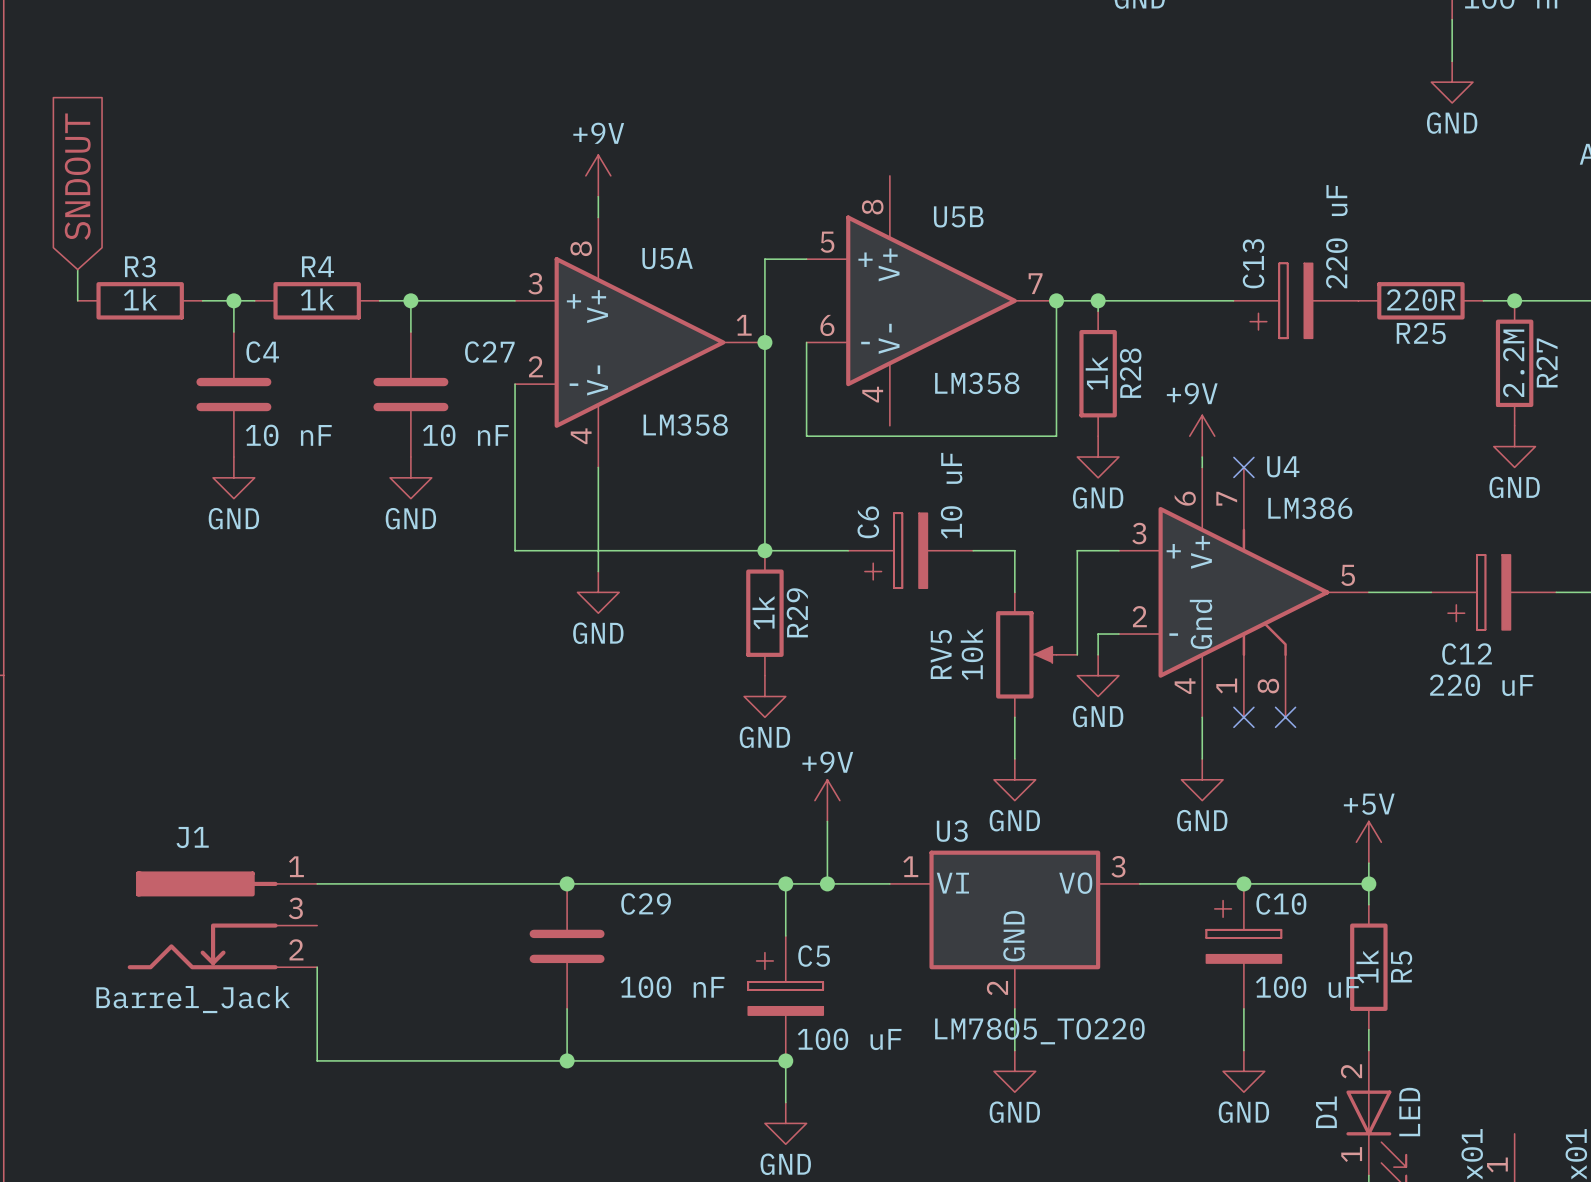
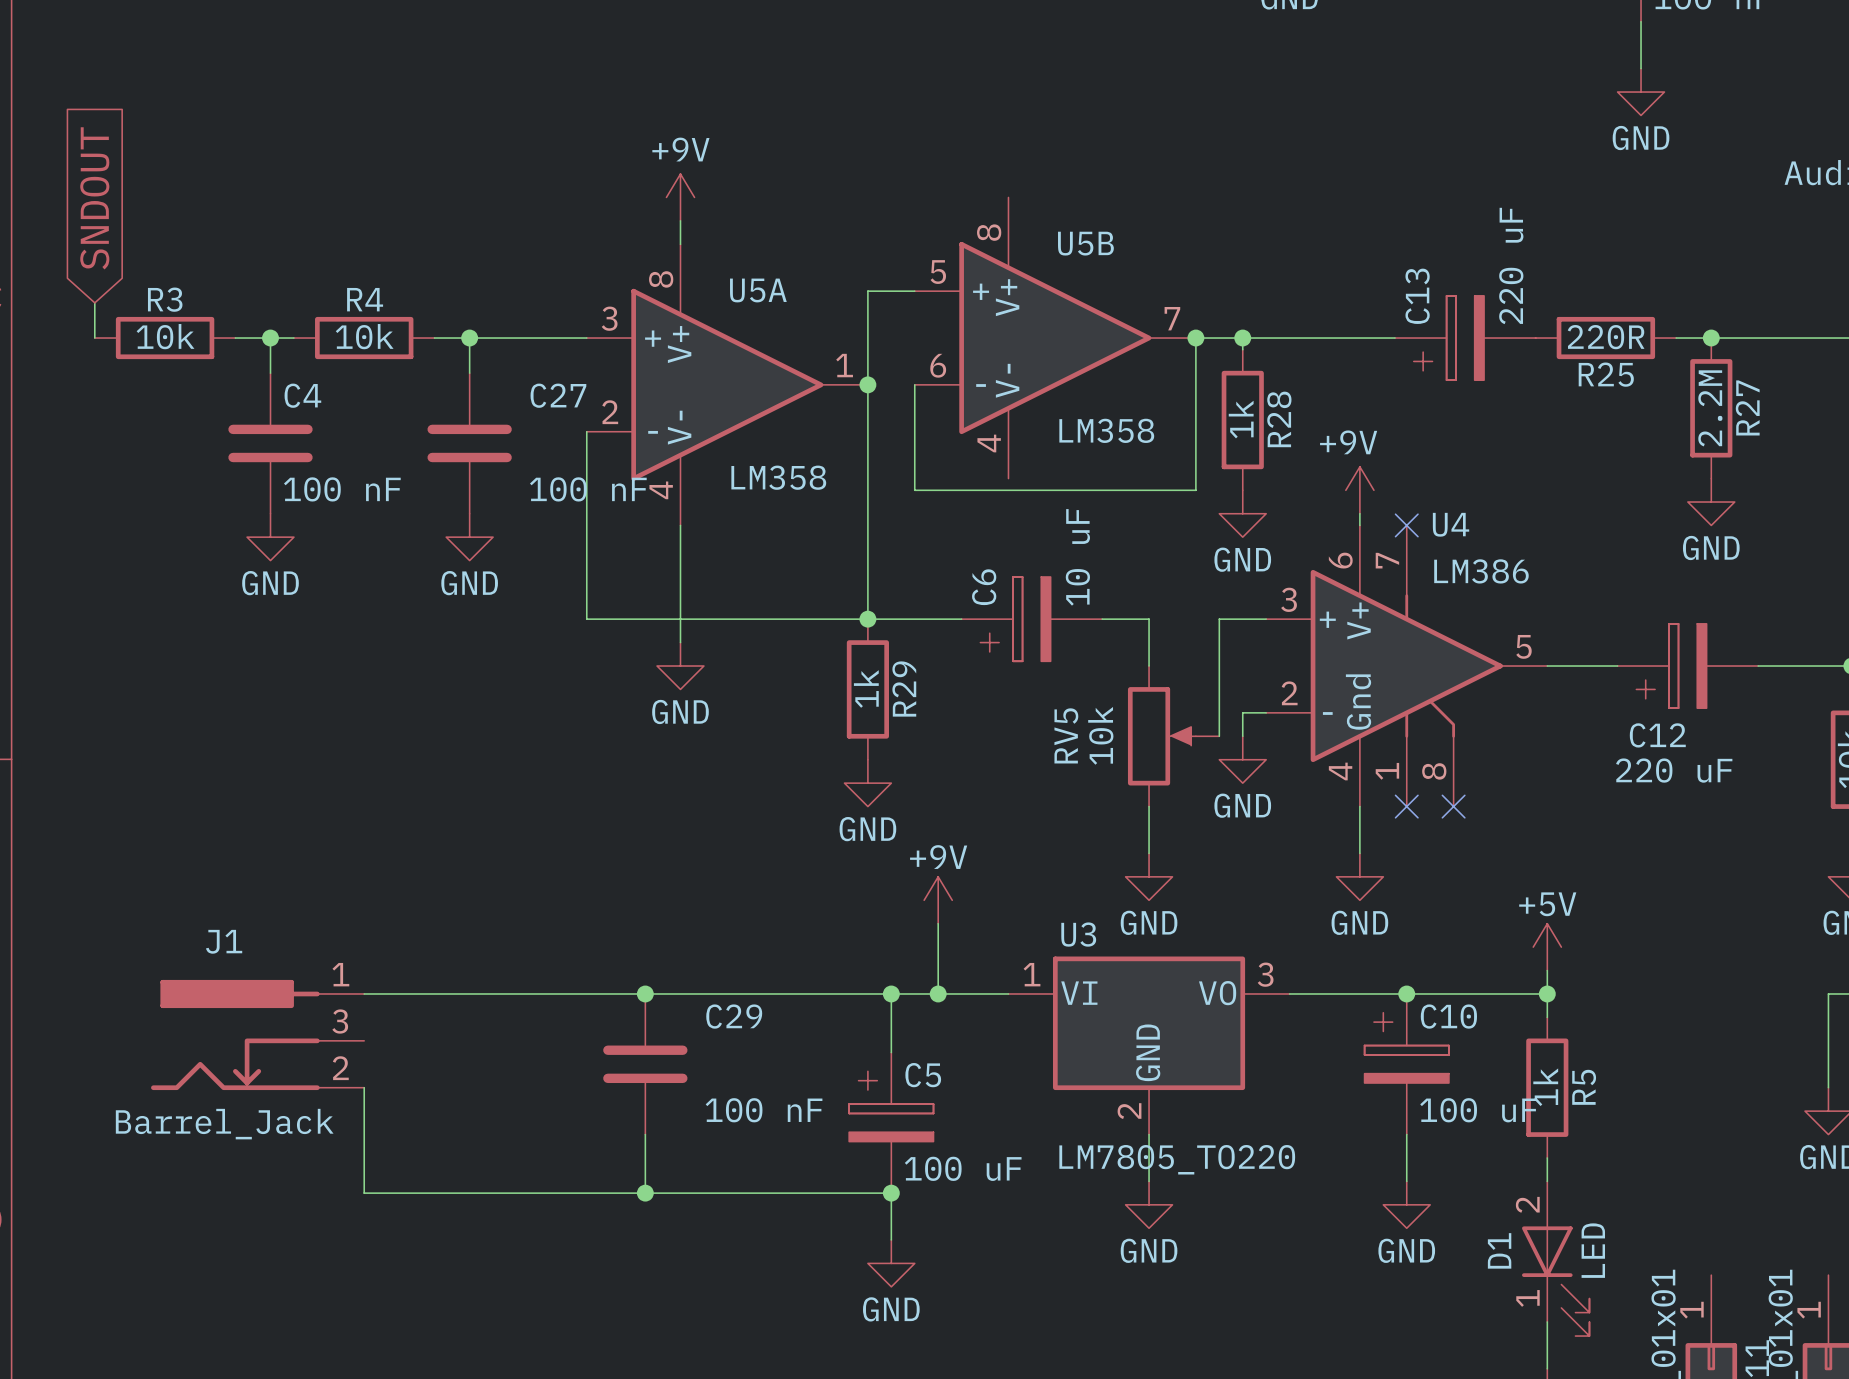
R3 value: 1k (140, 299) -> 10k (165, 336)
R4 value: 1k (317, 299) -> 10k (364, 336)
C4 value: 10 nF (288, 435) -> 100 nF (342, 489)
C27 value: 10 nF (465, 435) -> 100 nF (588, 489)

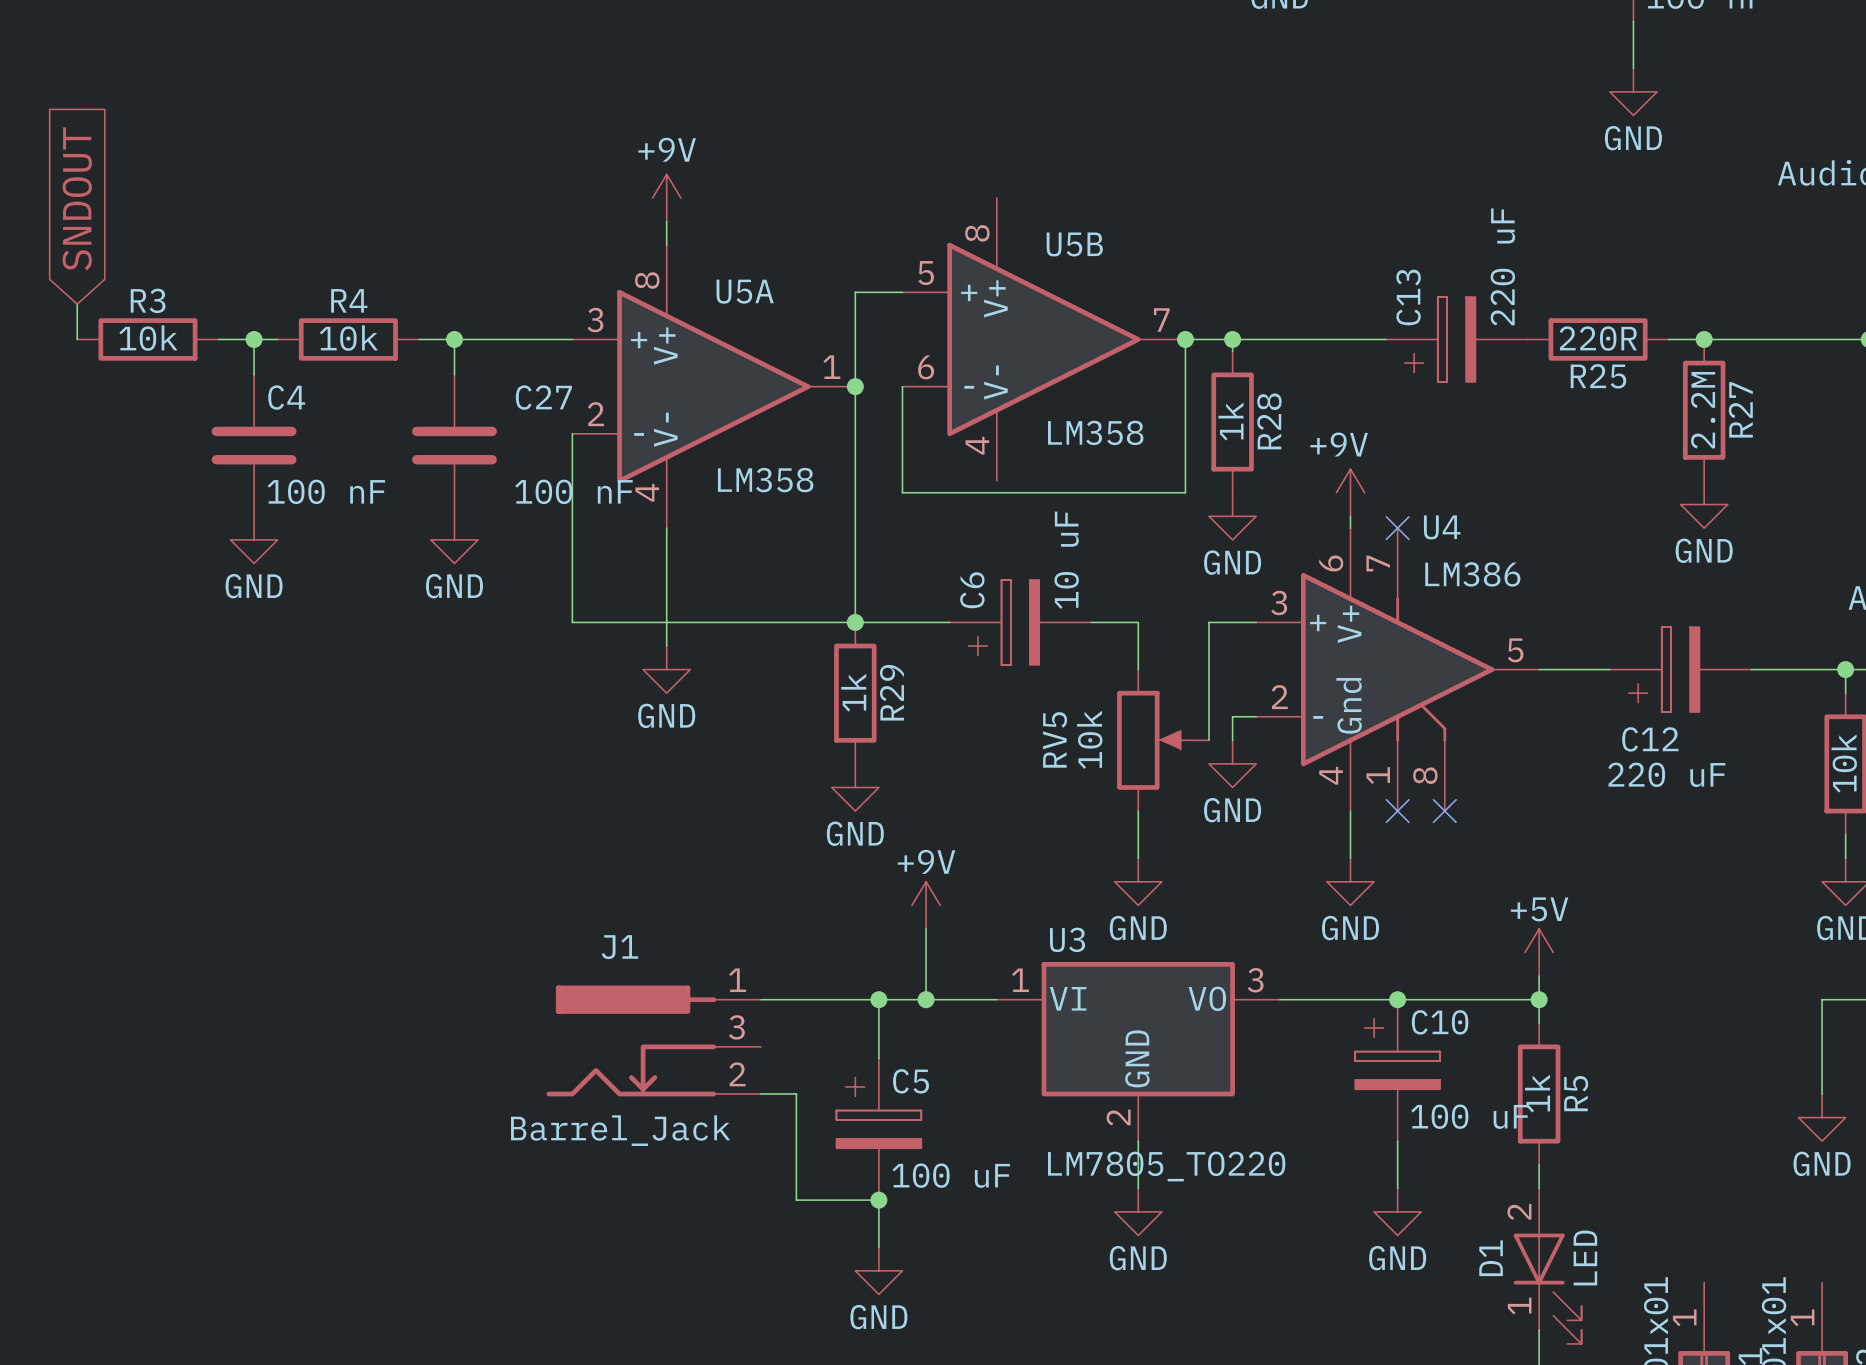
wire: (364, 993) (774, 993) -> none
junction: (645, 993) -> none
J1 position: (257, 1034) -> (653, 1040)
C29: 100 nF (645, 1064) -> none
wire: (364, 1087) (364, 1193) (809, 1193) -> (761, 1094) (796, 1094) (796, 1200)
wire: (645, 1134) (645, 1193) -> none
junction: (645, 1193) -> none

